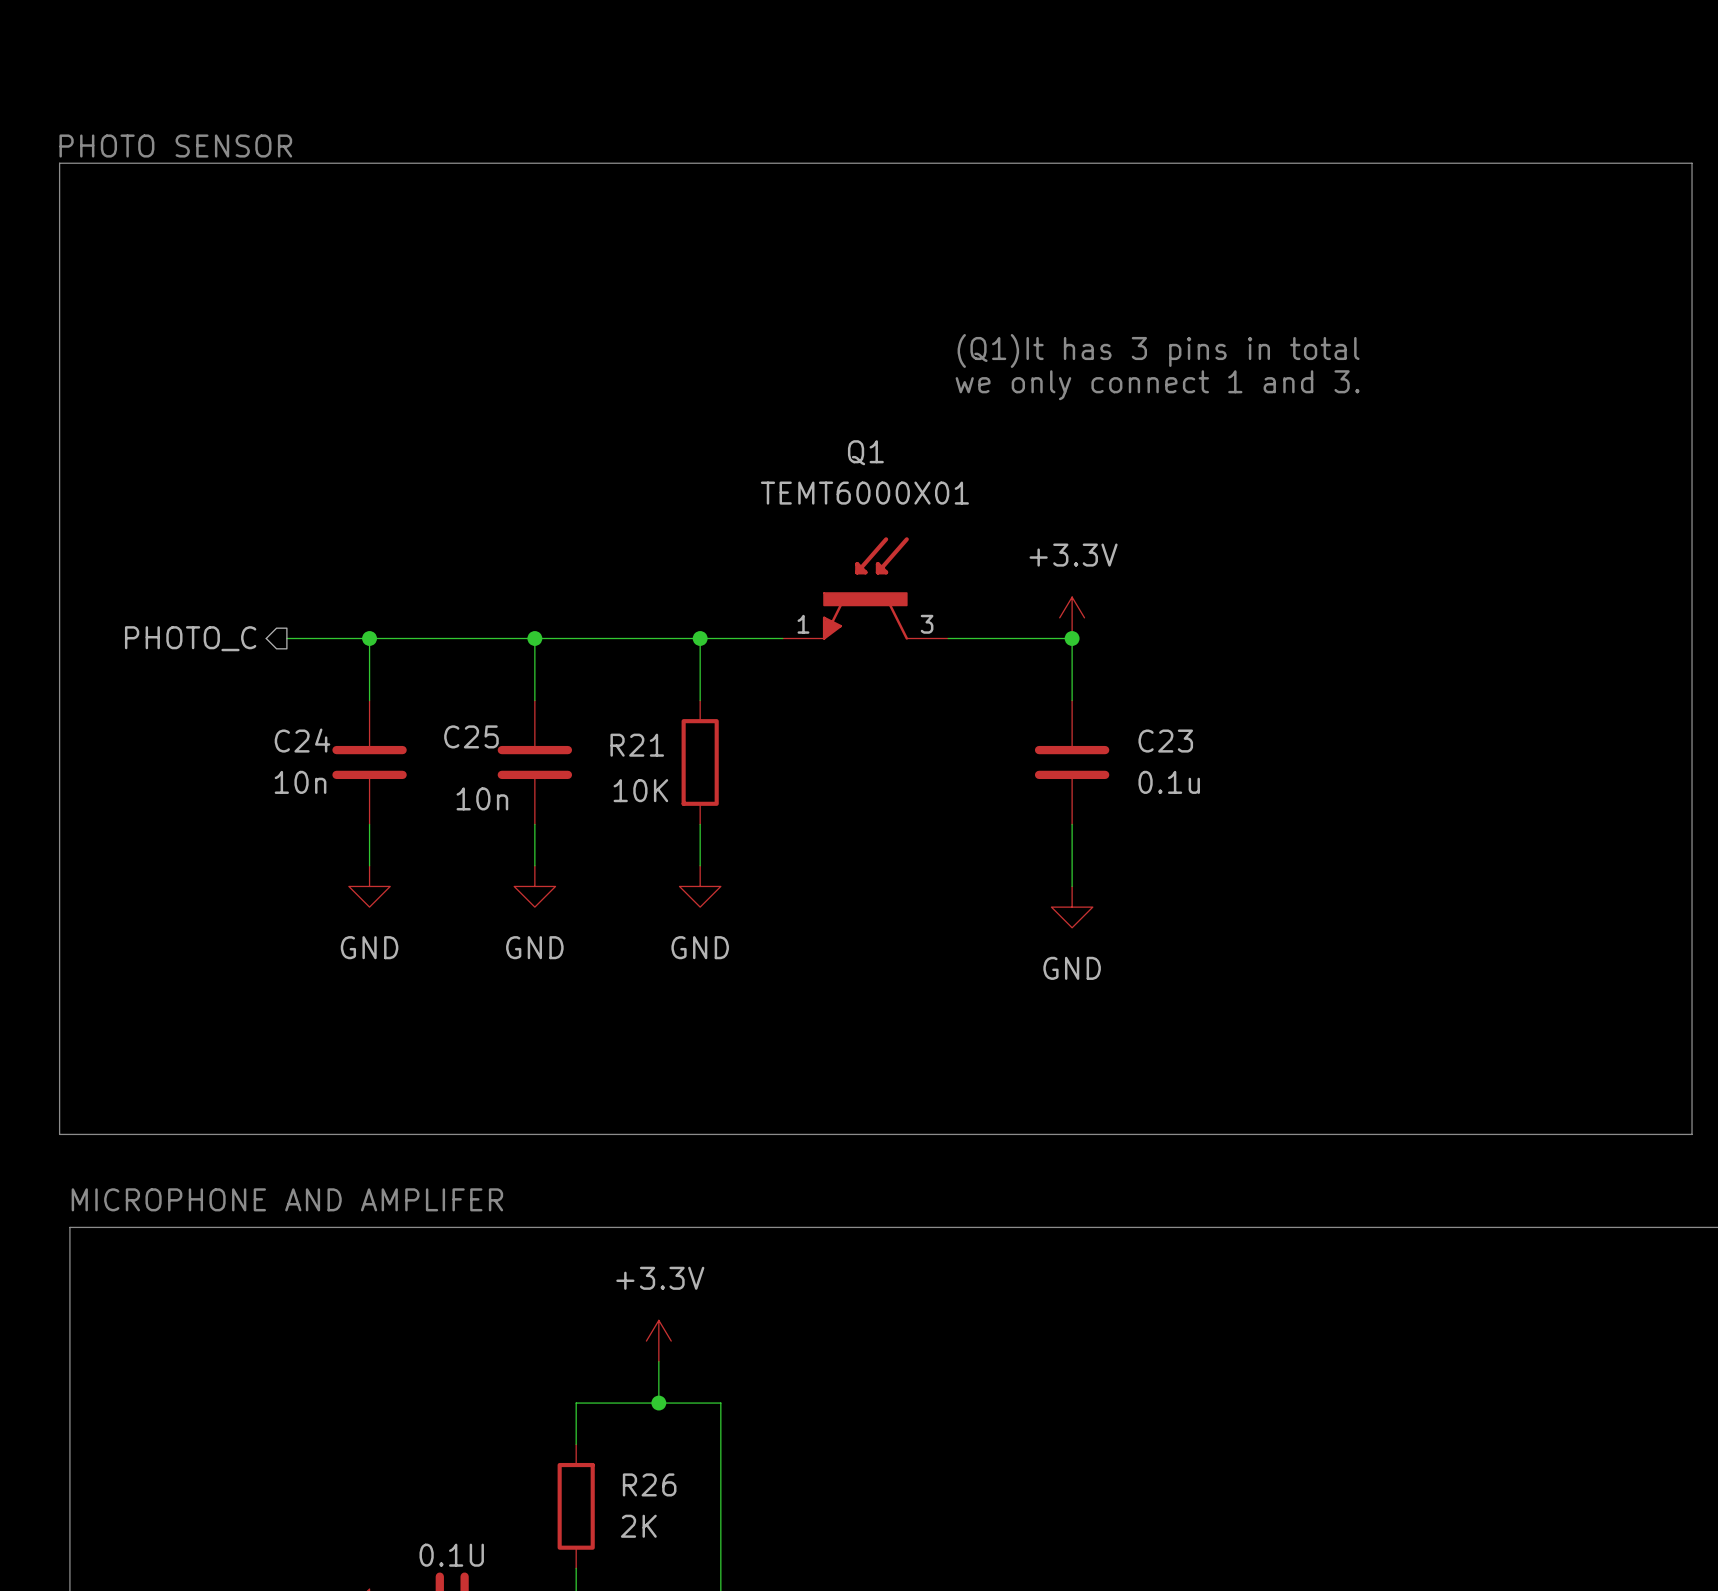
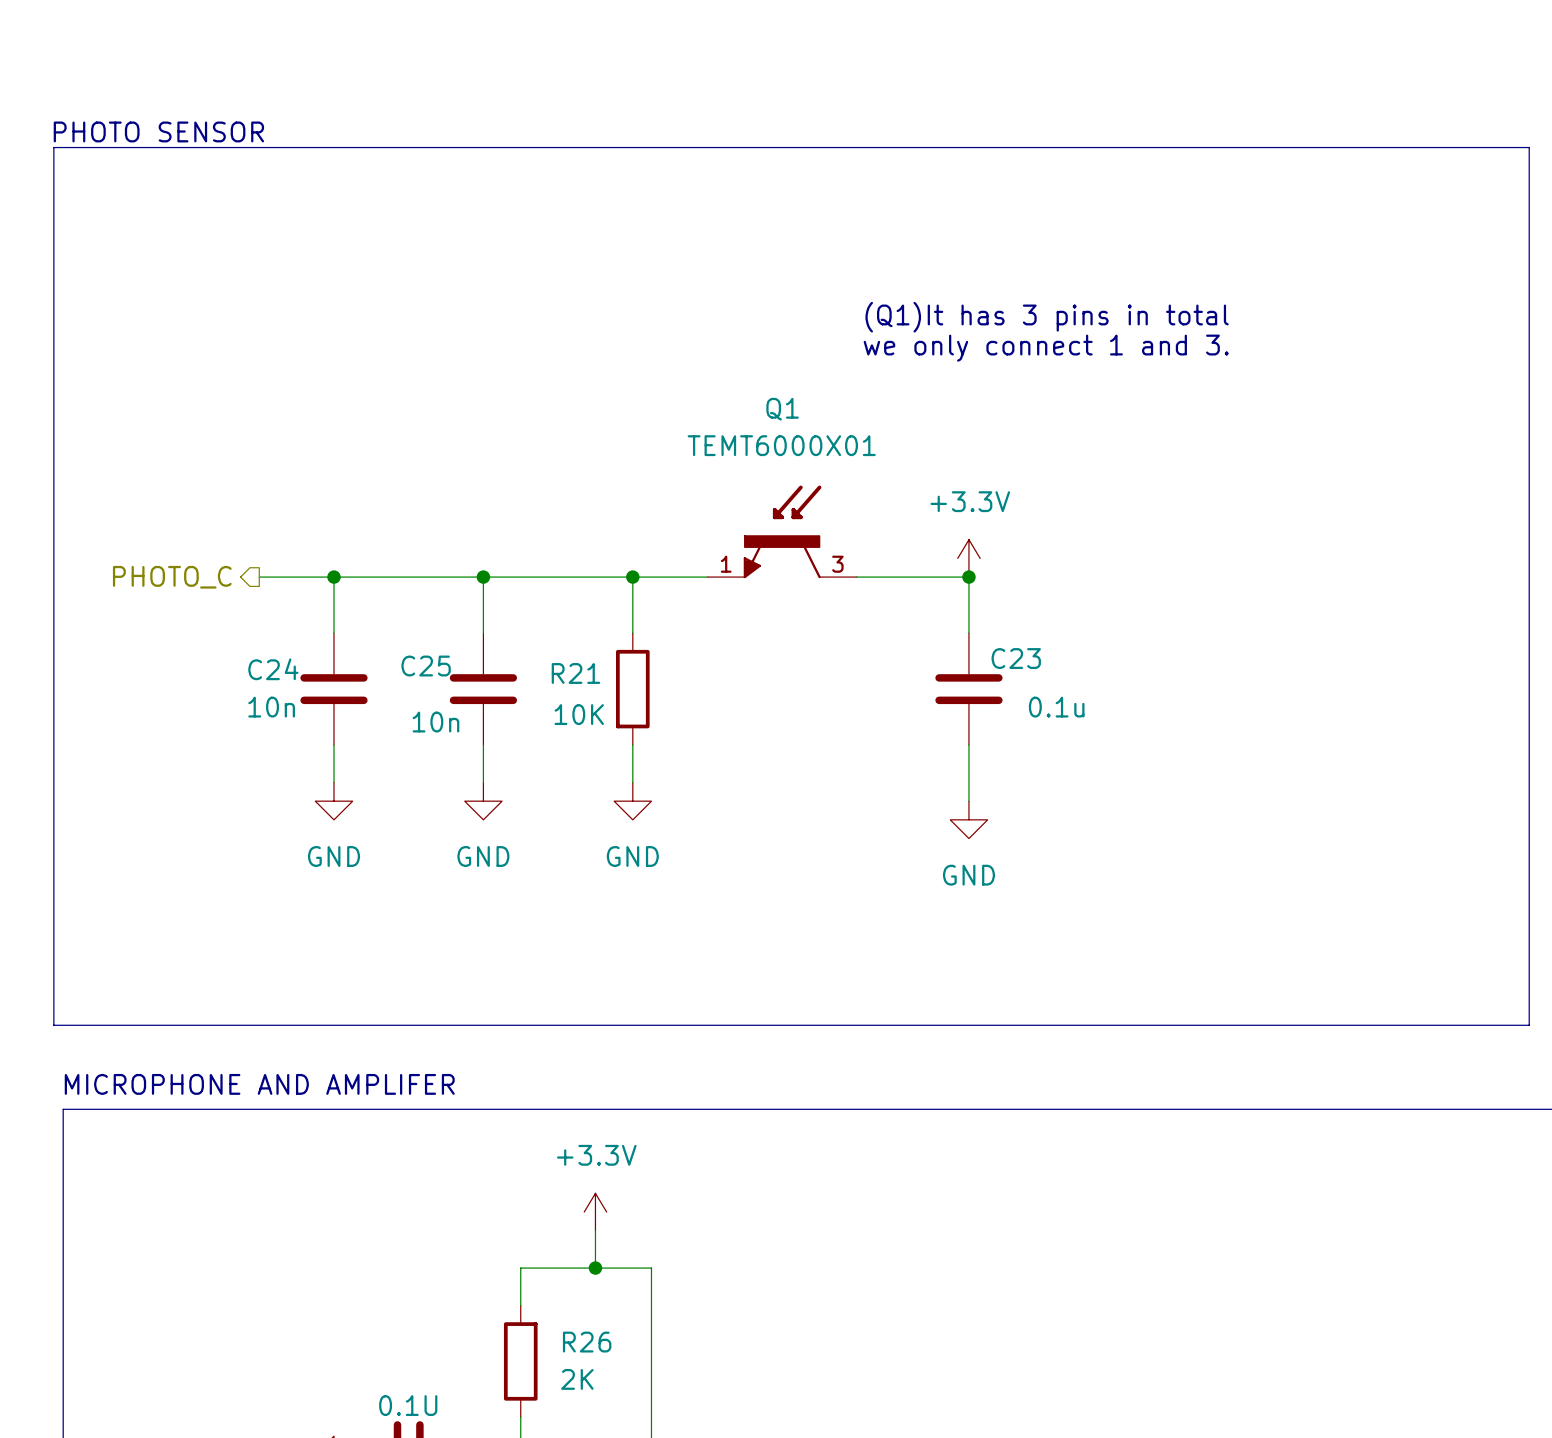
C23 name position: C23 (1165, 741) -> C23 (1016, 658)

